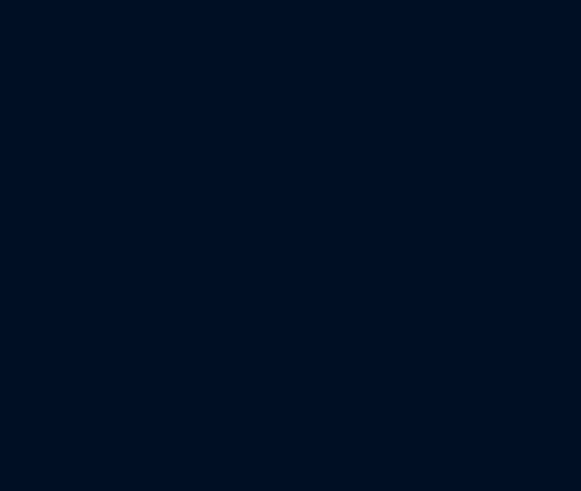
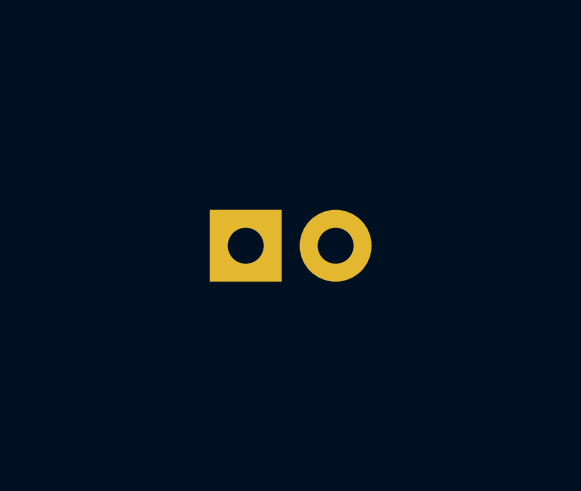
part: none -> (290, 245)

